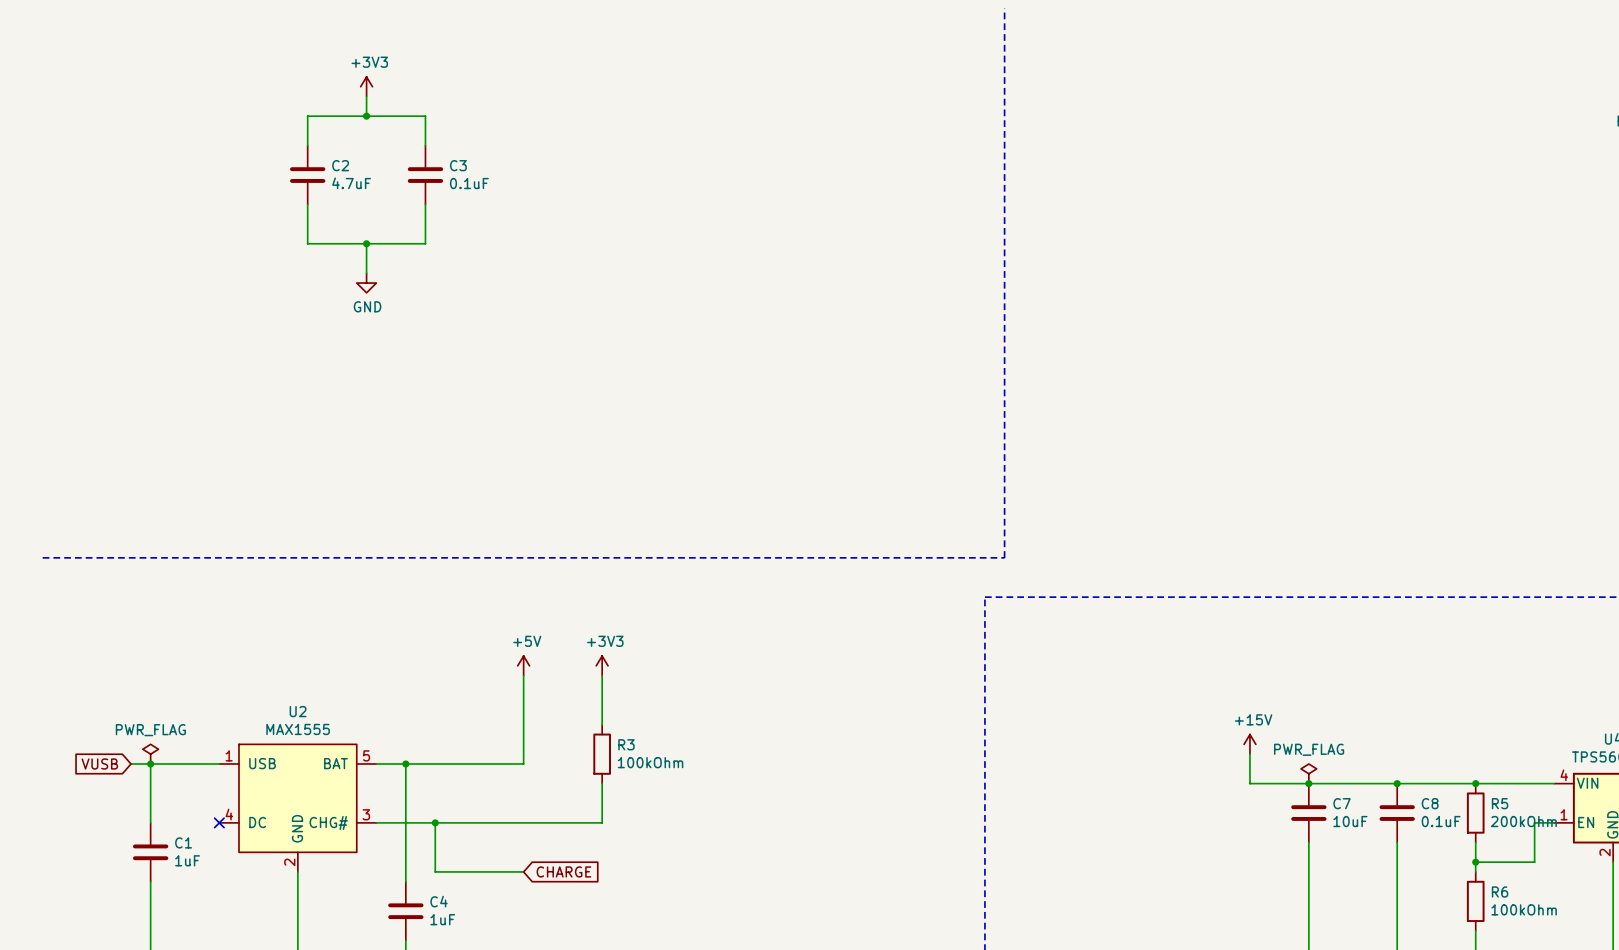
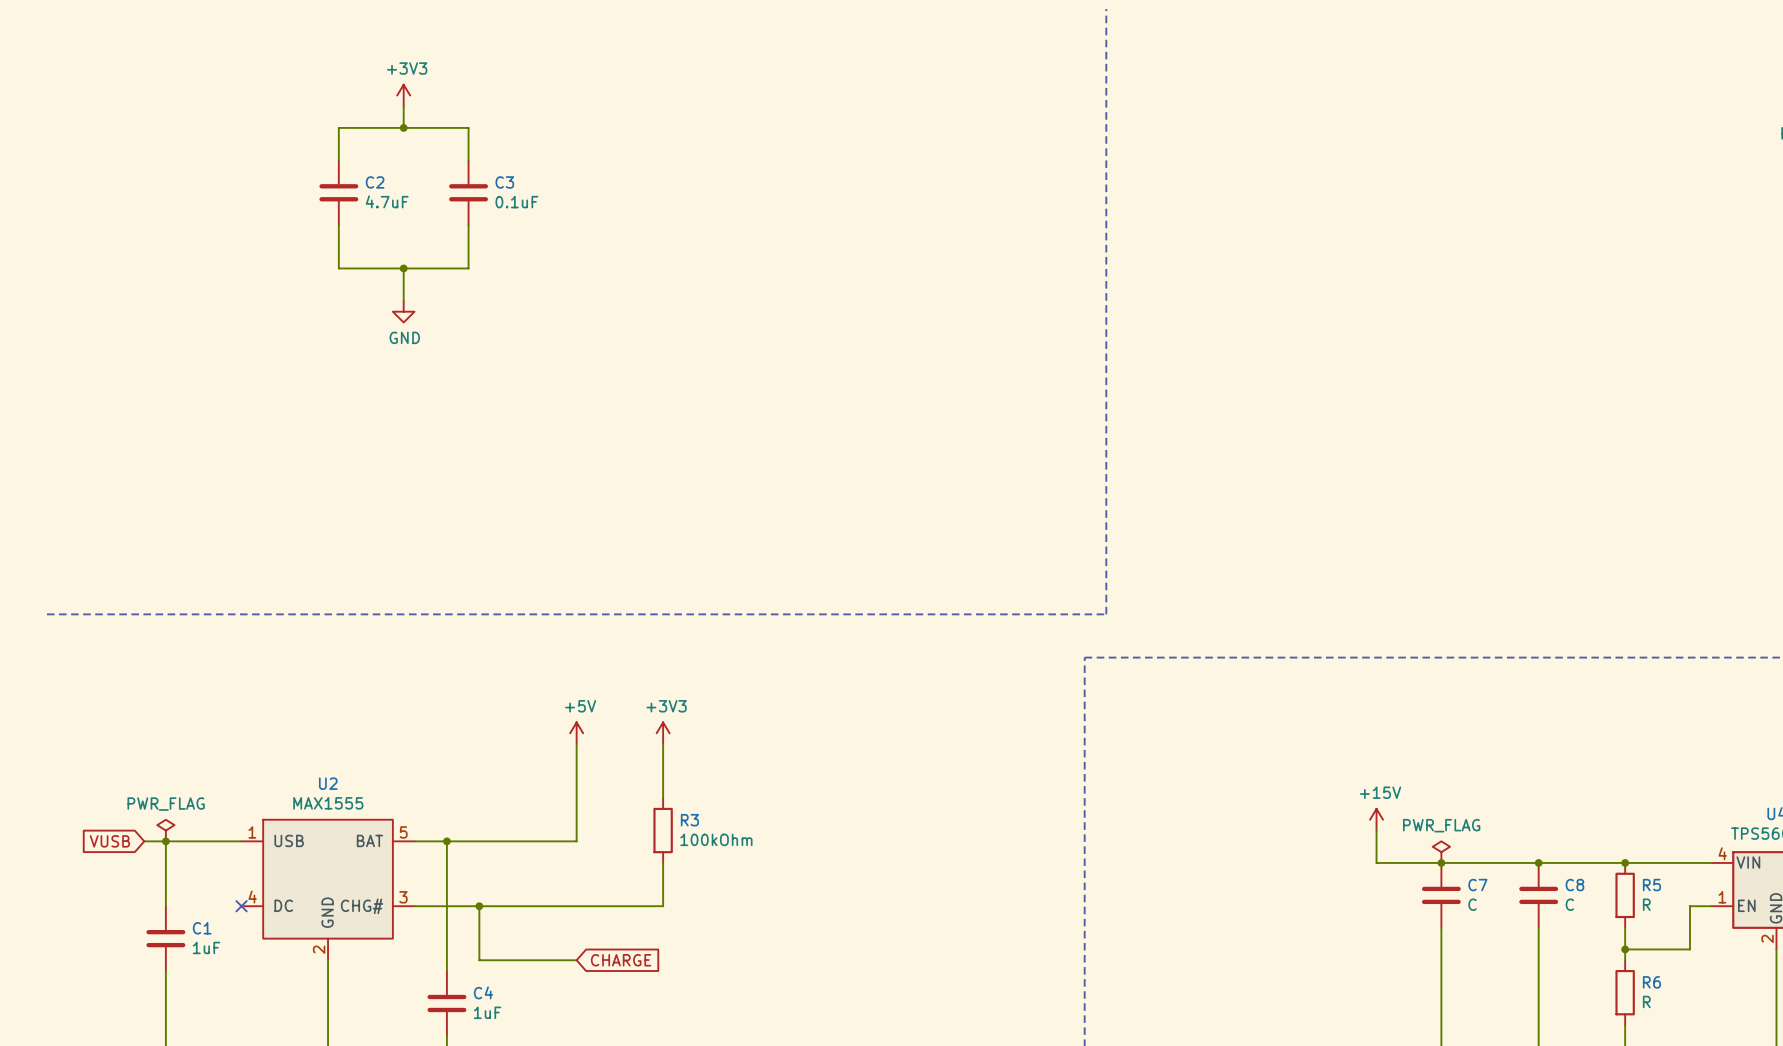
C7 value: 10uF (1350, 821) -> C (1472, 904)
C8 value: 0.1uF (1441, 821) -> C (1569, 904)
R5 value: 200kOhm (1523, 821) -> R (1646, 904)
R6 value: 100kOhm (1524, 909) -> R (1646, 1002)

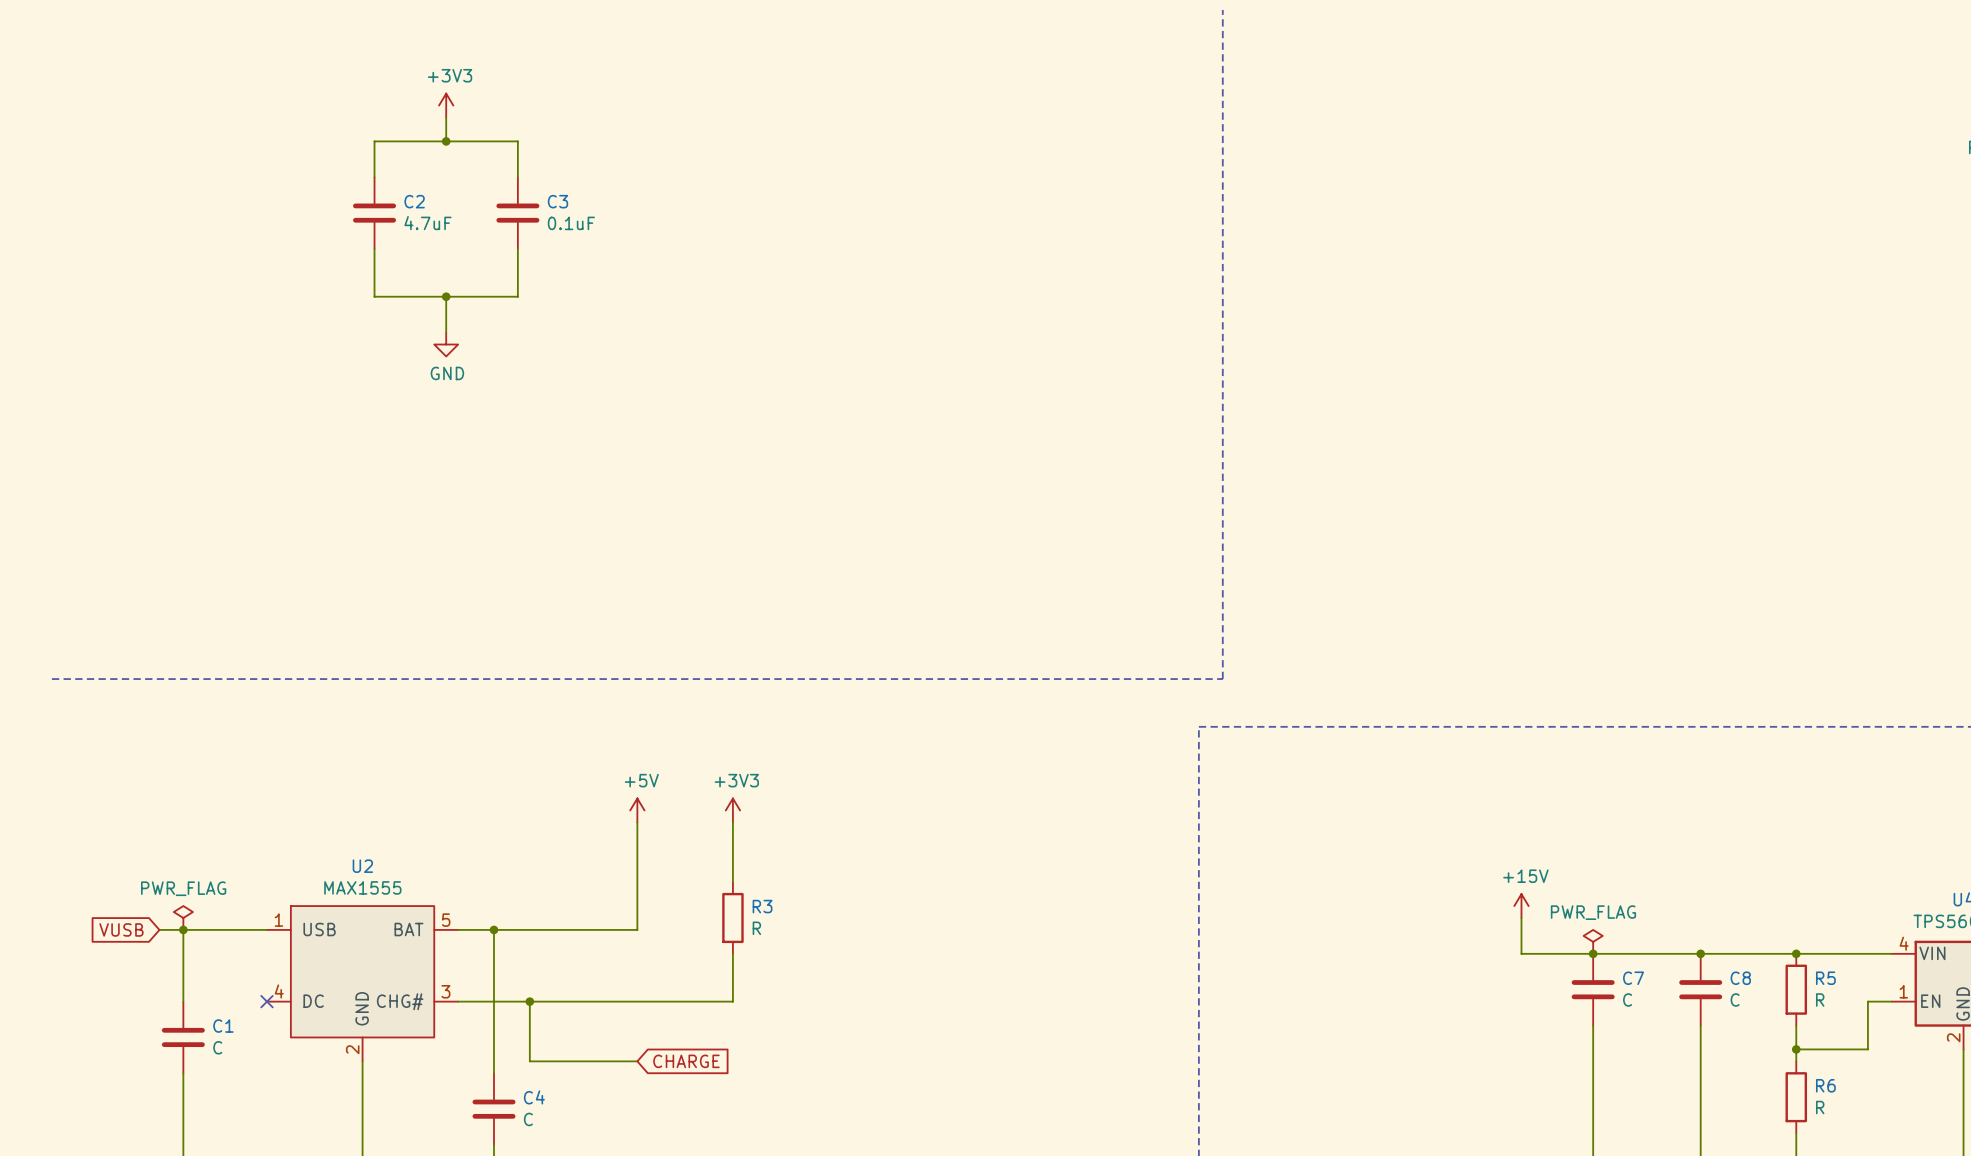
R3 value: 100kOhm (716, 839) -> R (756, 928)
C1 value: 1uF (206, 947) -> C (217, 1047)
C4 value: 1uF (487, 1012) -> C (528, 1119)

